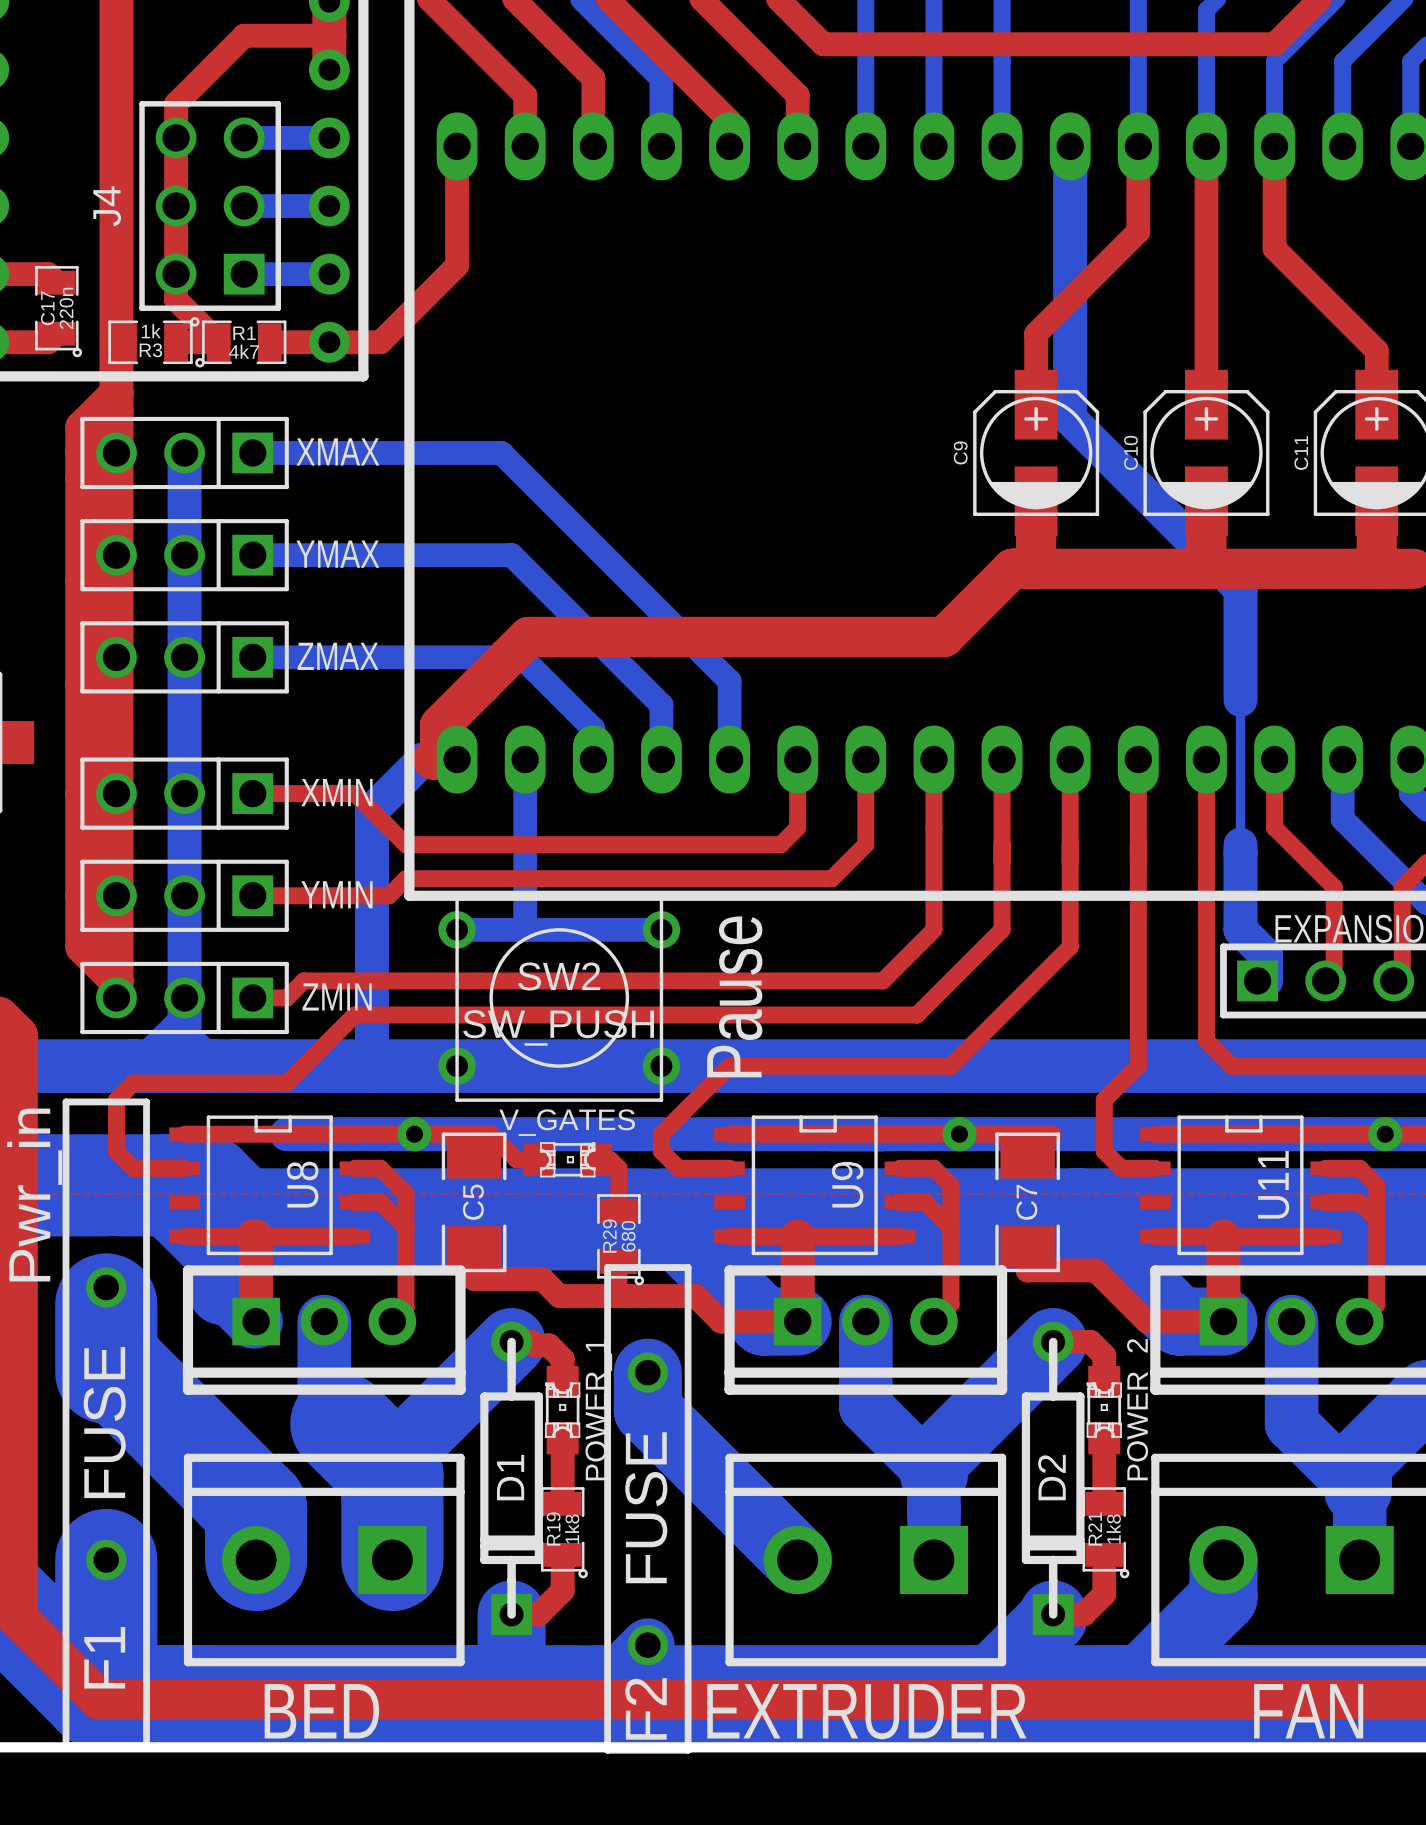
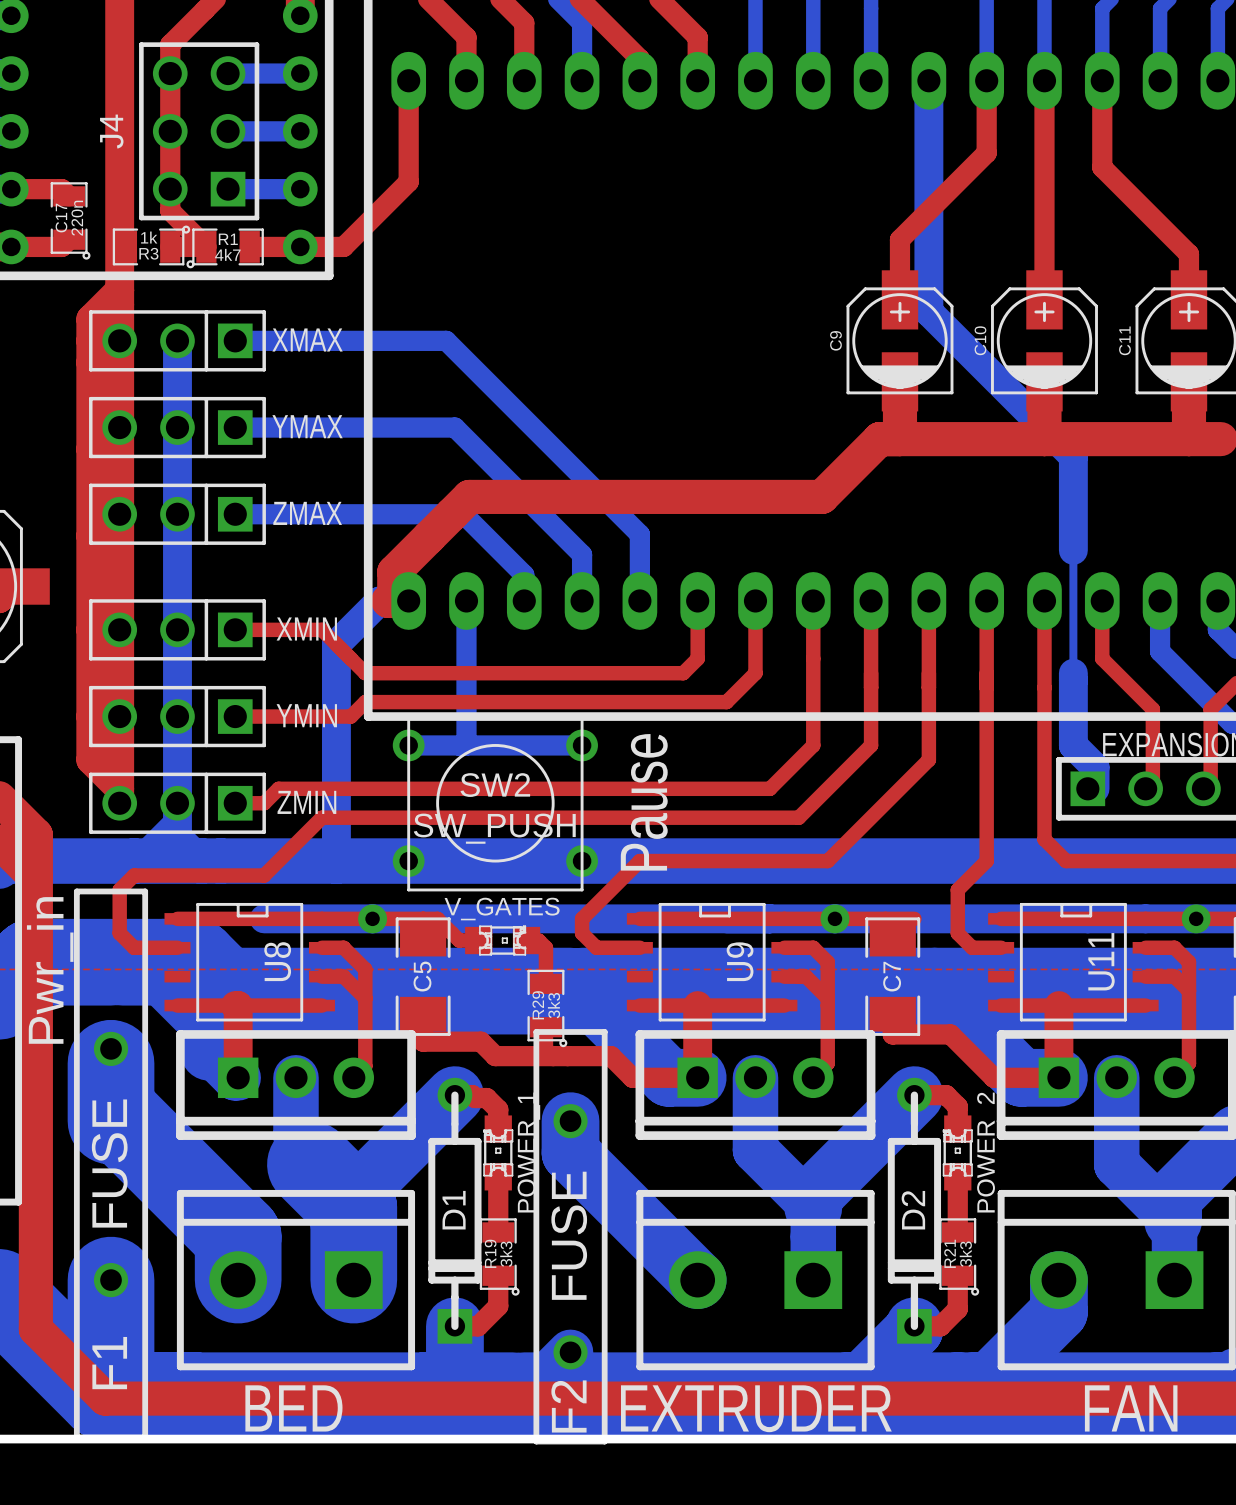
R29 value: 680 (628, 1236) -> 3k3 (553, 1005)
R19 value: 1k8 (572, 1529) -> 3k3 (506, 1254)
R21 value: 1k8 (1113, 1529) -> 3k3 (965, 1254)

